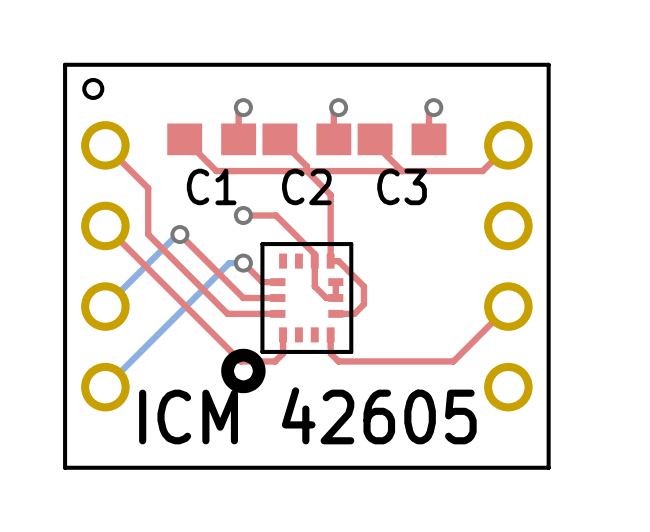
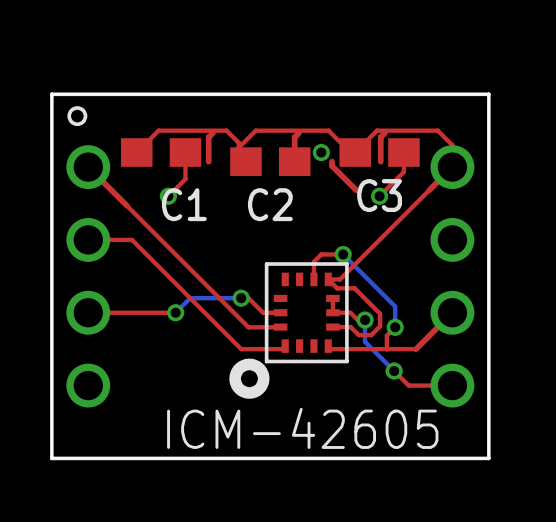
via: (243, 107) -> none
via position: (338, 107) -> (321, 152)
via: (433, 107) -> none
top track: none -> (238, 147) (255, 130) (328, 130) (350, 152) (355, 152) (377, 130) (437, 130) (452, 145) (452, 167)
top track: none -> (136, 152) (158, 130) (226, 130) (238, 142) (238, 152)
top track: none -> (185, 152) (185, 179) (168, 196)
top track: none -> (403, 152) (403, 171) (379, 196)
top track: (184, 139) (216, 171) (482, 171) -> (332, 327) (350, 327) (358, 335) (371, 335) (380, 326) (380, 313) (354, 288) (337, 288) (328, 279) (340, 279) (429, 190)
C1 position: (211, 139) -> (161, 152)
top track: (279, 139) (306, 166) (306, 171) (330, 194) (330, 261) (338, 261) (363, 286) (363, 304) (354, 313) (335, 313) -> none
C3 position: (402, 139) -> (379, 152)
via: none -> (168, 196)
via: none -> (379, 196)
top track: (148, 188) (148, 234) (227, 313) (277, 313) -> (126, 205) (248, 327) (280, 327)
top track: (243, 215) (276, 215) (314, 254) (314, 286) (326, 298) (335, 298) (335, 282) -> none
via: (243, 215) -> none
top track: (105, 225) (240, 361) (275, 361) (283, 353) (283, 334) -> (88, 239) (131, 239) (241, 349) (282, 349) (285, 346)
top track: (179, 234) (243, 298) (277, 298) -> none
bottom track: (179, 234) (177, 234) (105, 306) -> none
via: (179, 234) -> none
top track: none -> (343, 254) (321, 254) (313, 261) (313, 279)
bottom track: none -> (343, 254) (395, 306) (395, 327)
via: none -> (343, 254)
top track: (243, 263) (262, 282) (277, 282) -> none
bottom track: (243, 263) (229, 263) (105, 387) -> none
via: (243, 263) -> none
top track: none -> (241, 298) (248, 298) (263, 312) (280, 312)
bottom track: none -> (241, 298) (190, 298) (175, 312)
via: none -> (241, 298)
top track: none -> (332, 298) (332, 312) (350, 312) (357, 320) (365, 320)
top track: none -> (88, 312) (175, 312)
via: none -> (175, 312)
bottom track: none -> (365, 320) (365, 341) (394, 371)
via: none -> (365, 320)
part position: (287, 317) -> (289, 330)
top track: none -> (395, 327) (386, 335) (386, 349)
via: none -> (395, 327)
top track: (330, 334) (330, 353) (338, 361) (453, 361) (468, 346) -> (328, 346) (331, 349) (416, 349)
top track: none -> (394, 371) (408, 385) (452, 385)
via: none -> (394, 371)
text: ICM 42605 (307, 415) -> ICM-42605 (302, 428)

